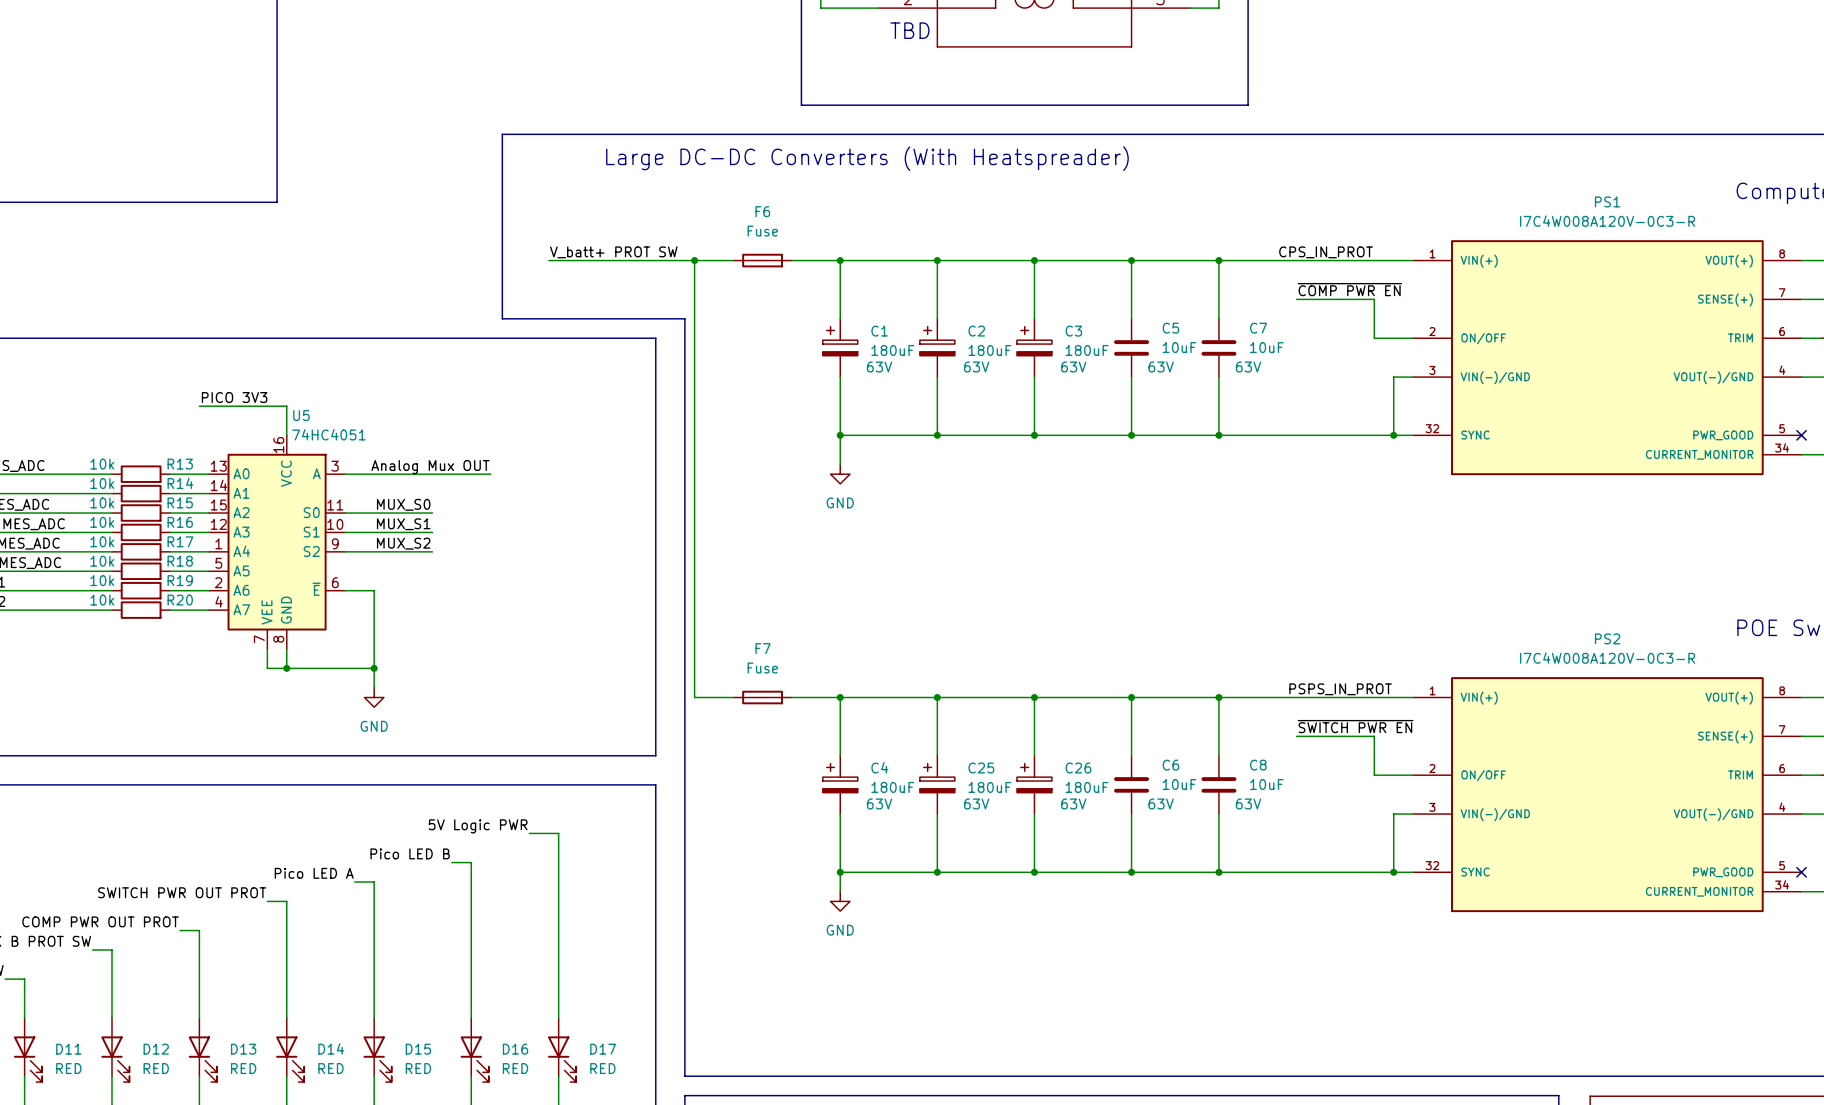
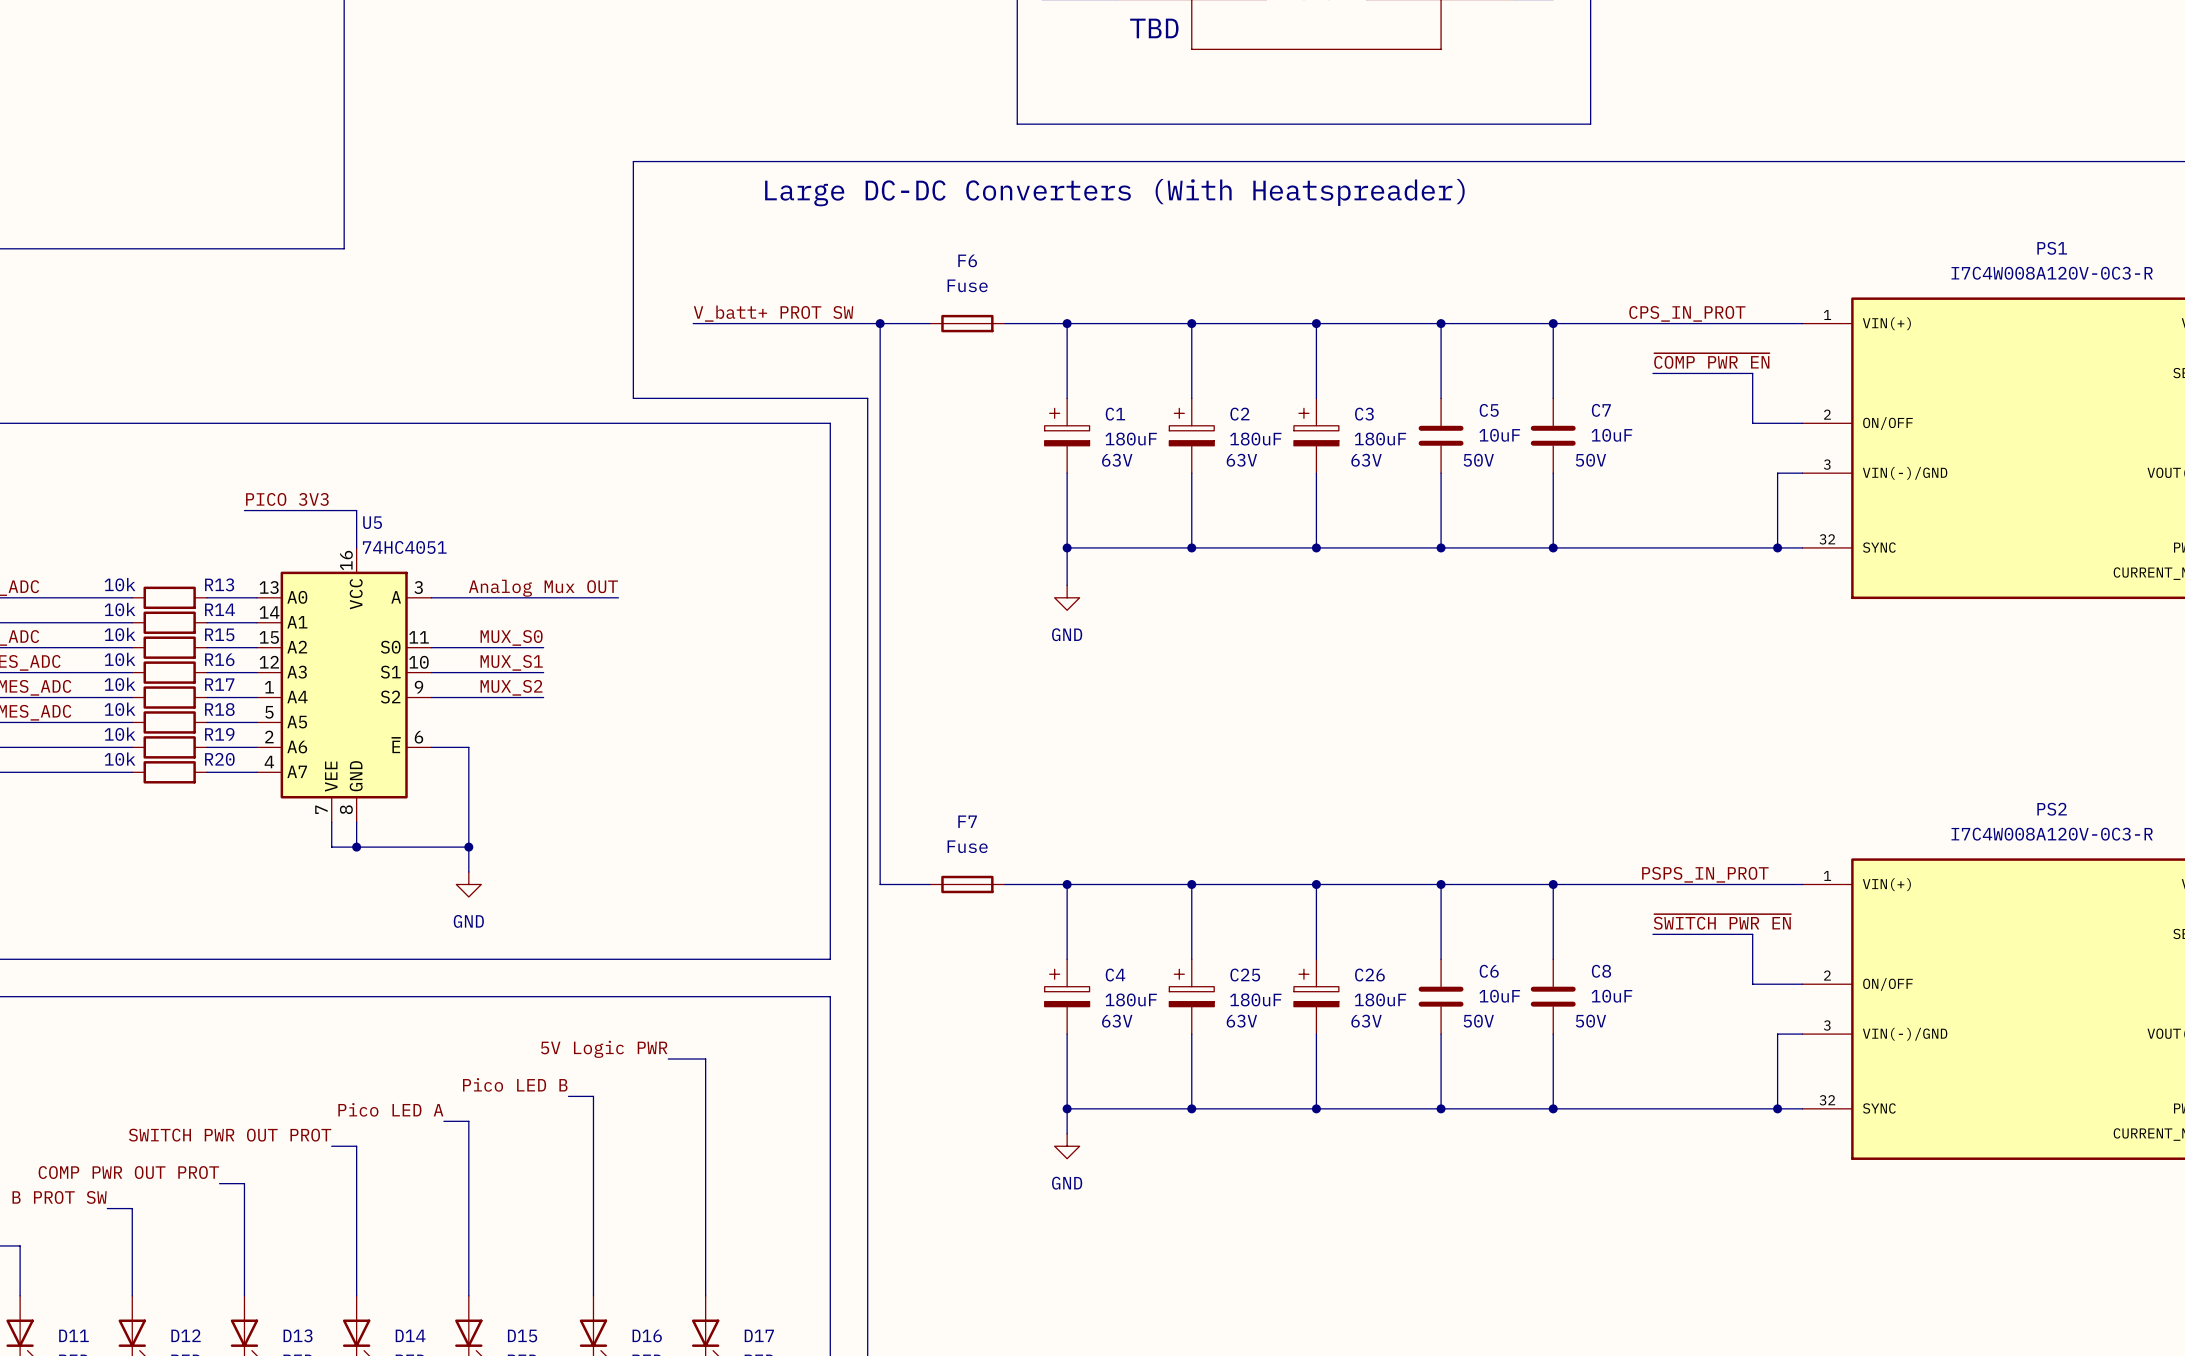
C5 text: 63V (1161, 367) -> 50V (1478, 460)
C7 text: 63V (1248, 367) -> 50V (1590, 460)
C6 text: 63V (1161, 803) -> 50V (1478, 1021)
C8 text: 63V (1248, 803) -> 50V (1590, 1021)

